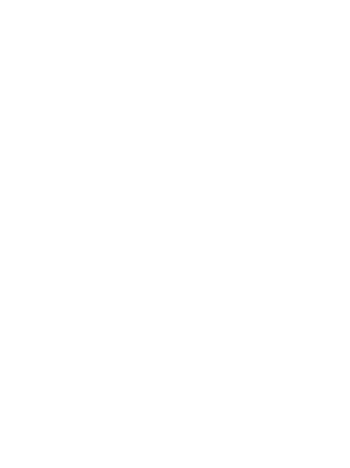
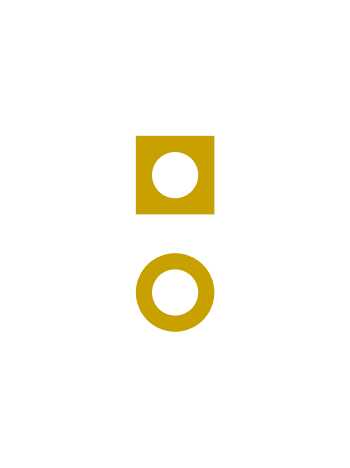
part: none -> (175, 233)

